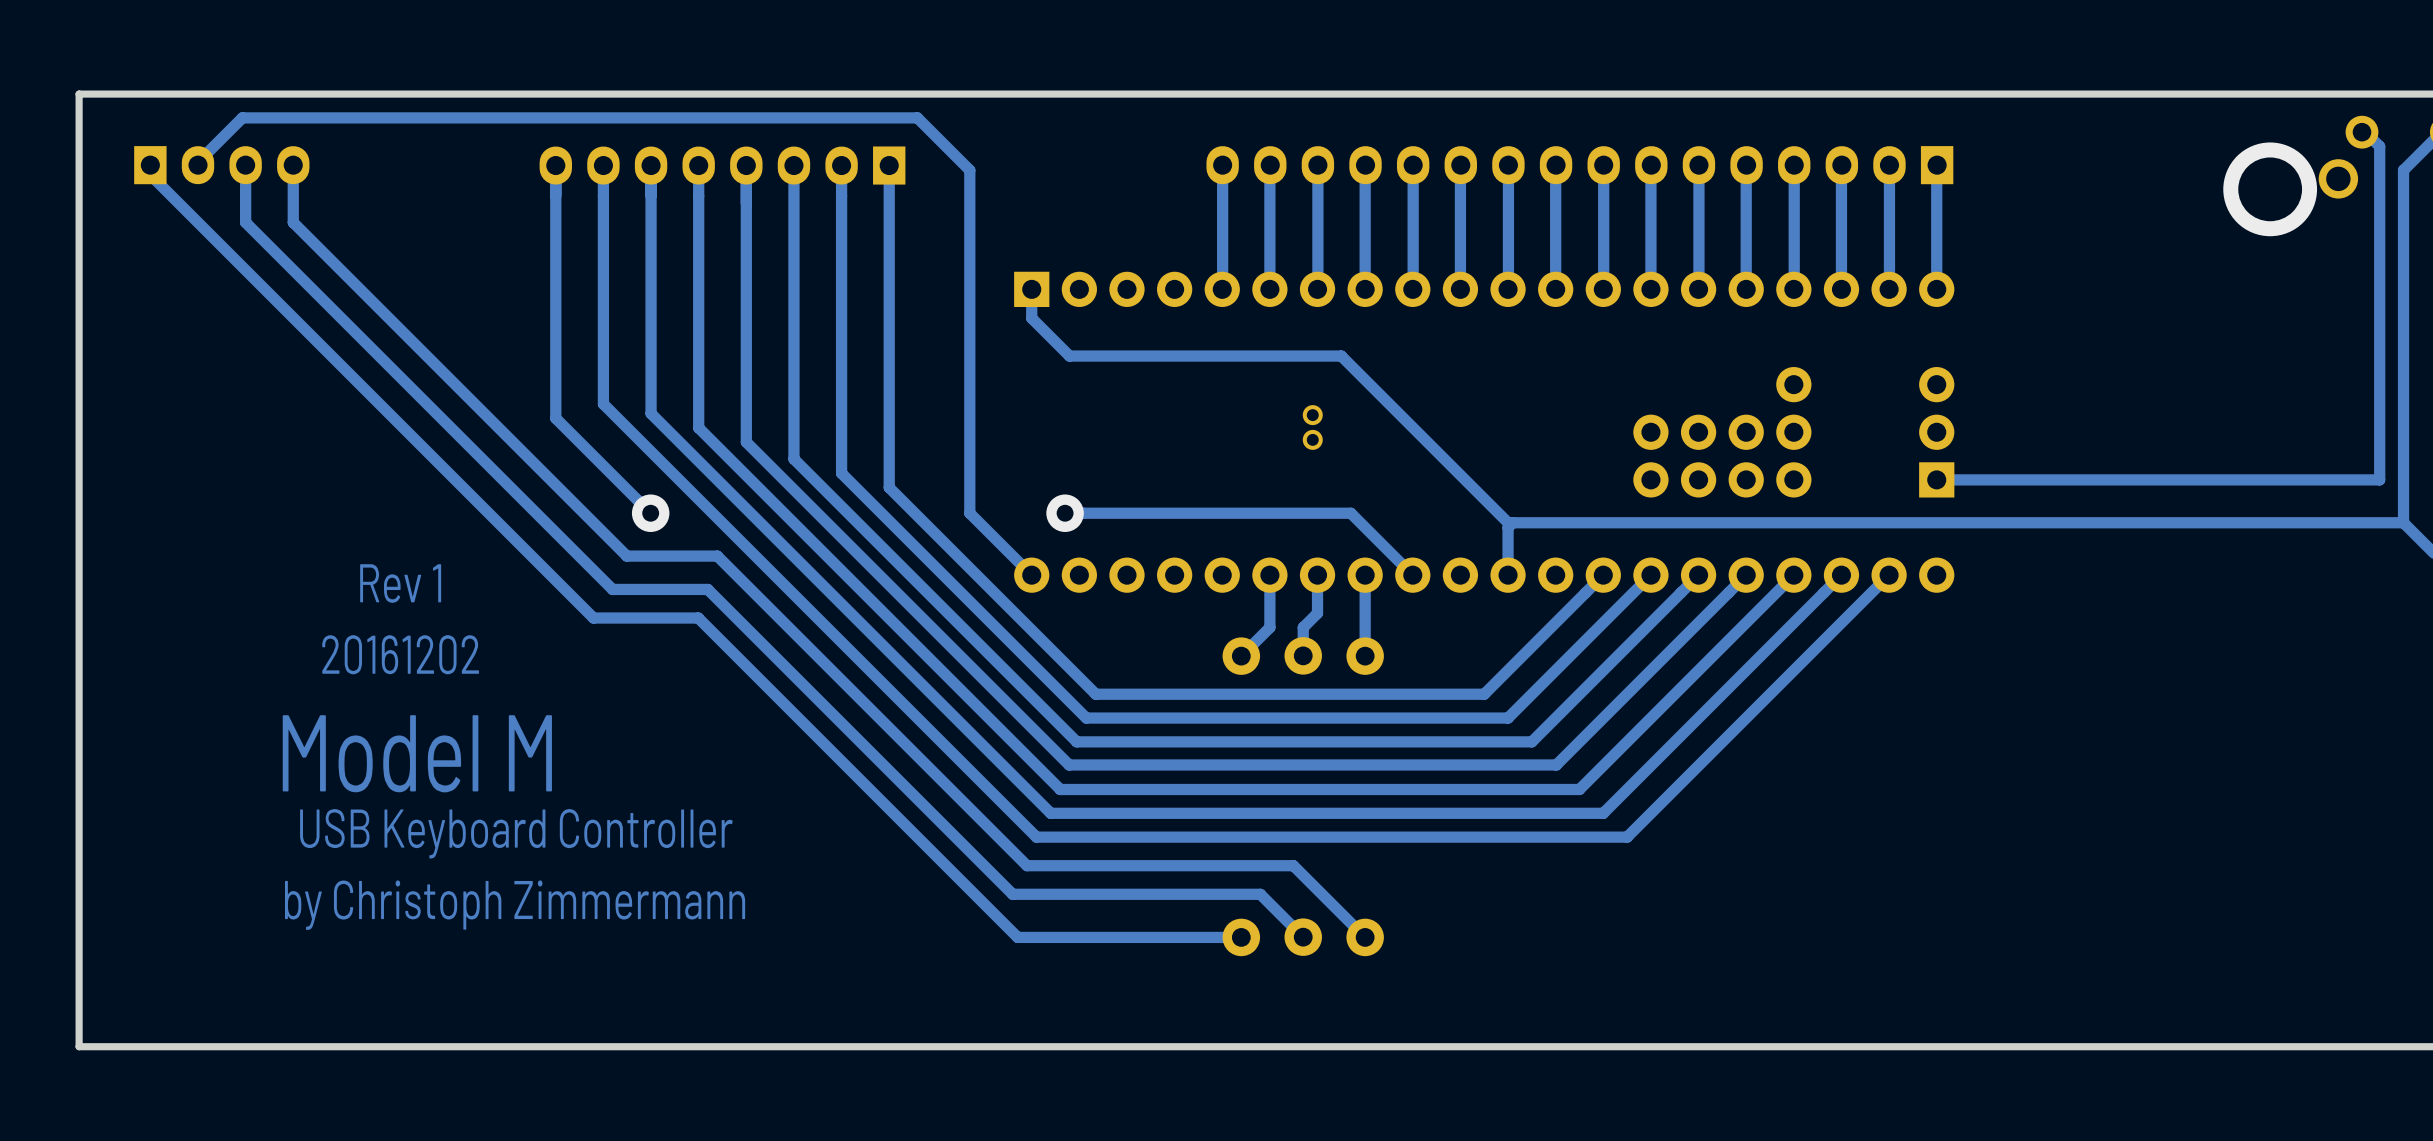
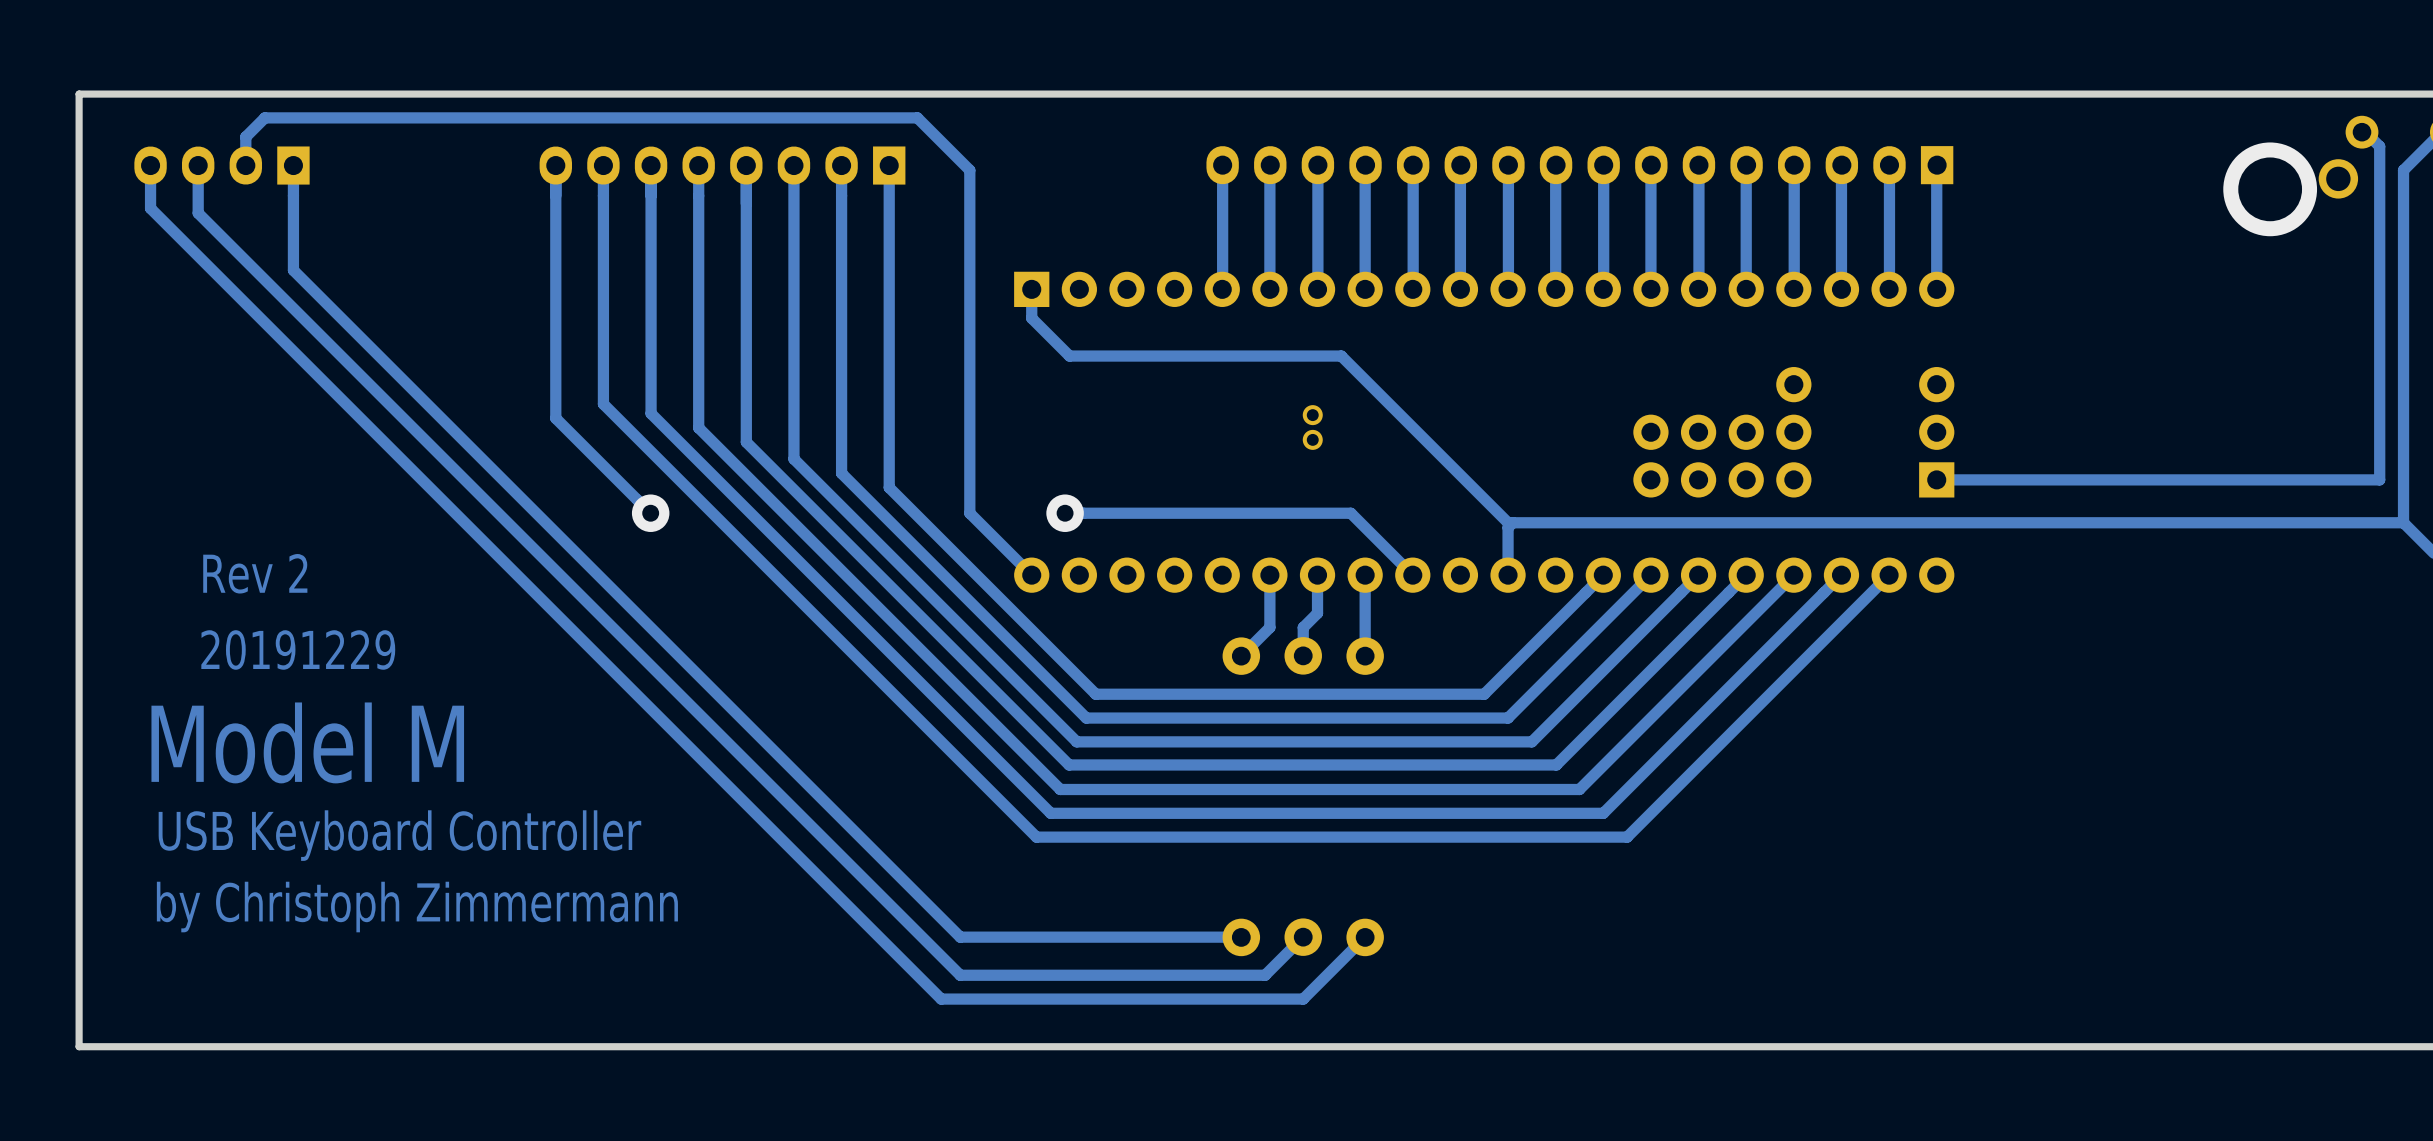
track: (264, 117) (242, 117) (198, 162) (198, 168) -> (264, 117) (245, 136) (245, 165)
track: (150, 165) (150, 174) (593, 618) (698, 618) (1017, 937) (1241, 937) -> (150, 165) (150, 208) (941, 999) (1303, 999) (1364, 937)
track: none -> (198, 165) (198, 213) (960, 975) (1265, 975) (1303, 937)
part rotation: 0° (221, 165) -> 180° (222, 165)
track: (245, 165) (245, 222) (293, 270) -> (293, 165) (293, 270)
track: (293, 165) (293, 222) (626, 556) (717, 556) (1026, 865) (1293, 865) (1365, 937) -> none
text: Rev 1 (400, 583) -> Rev 2 (255, 573)
track: (612, 589) (707, 589) (1012, 894) (1260, 894) (1303, 937) -> (612, 589) (960, 937) (1241, 937)
text: 20161202 (400, 654) -> 20191229 (298, 649)
text position: Model M (417, 753) -> Model M (307, 742)
text position: USB Keyboard Controller (516, 833) -> USB Keyboard Controller (399, 835)
text position: by Christoph Zimmermann (515, 905) -> by Christoph Zimmermann (417, 907)

